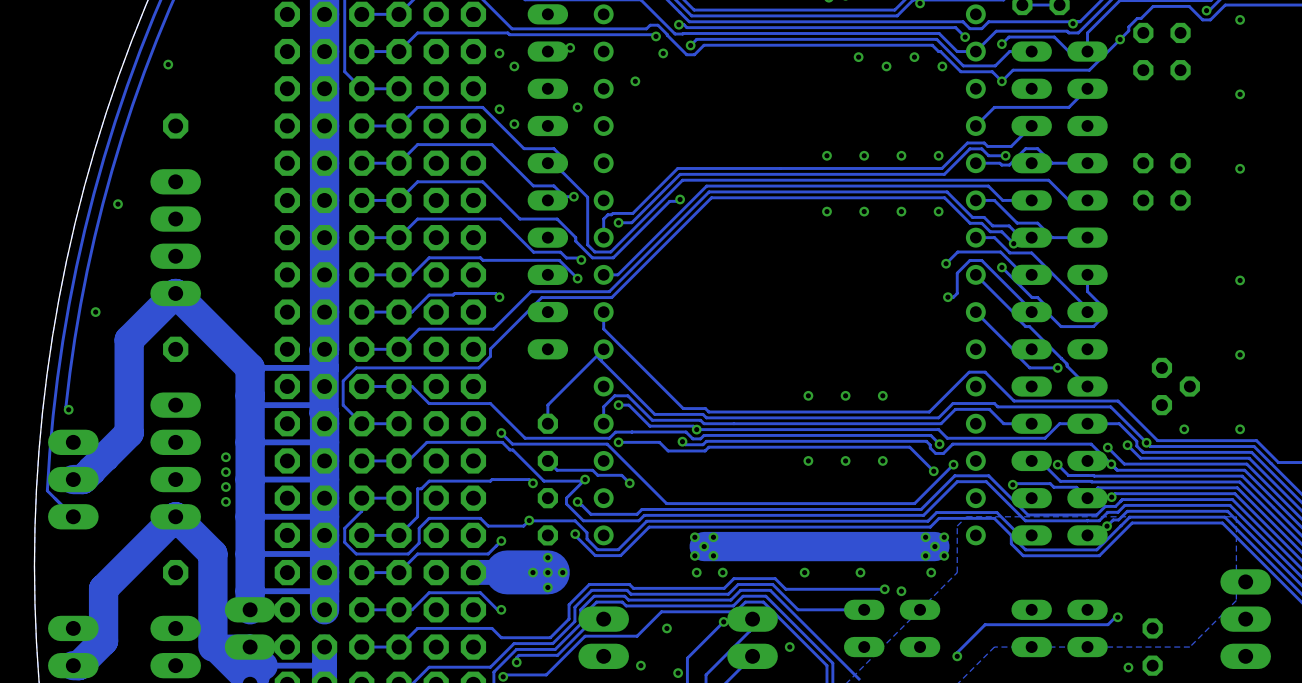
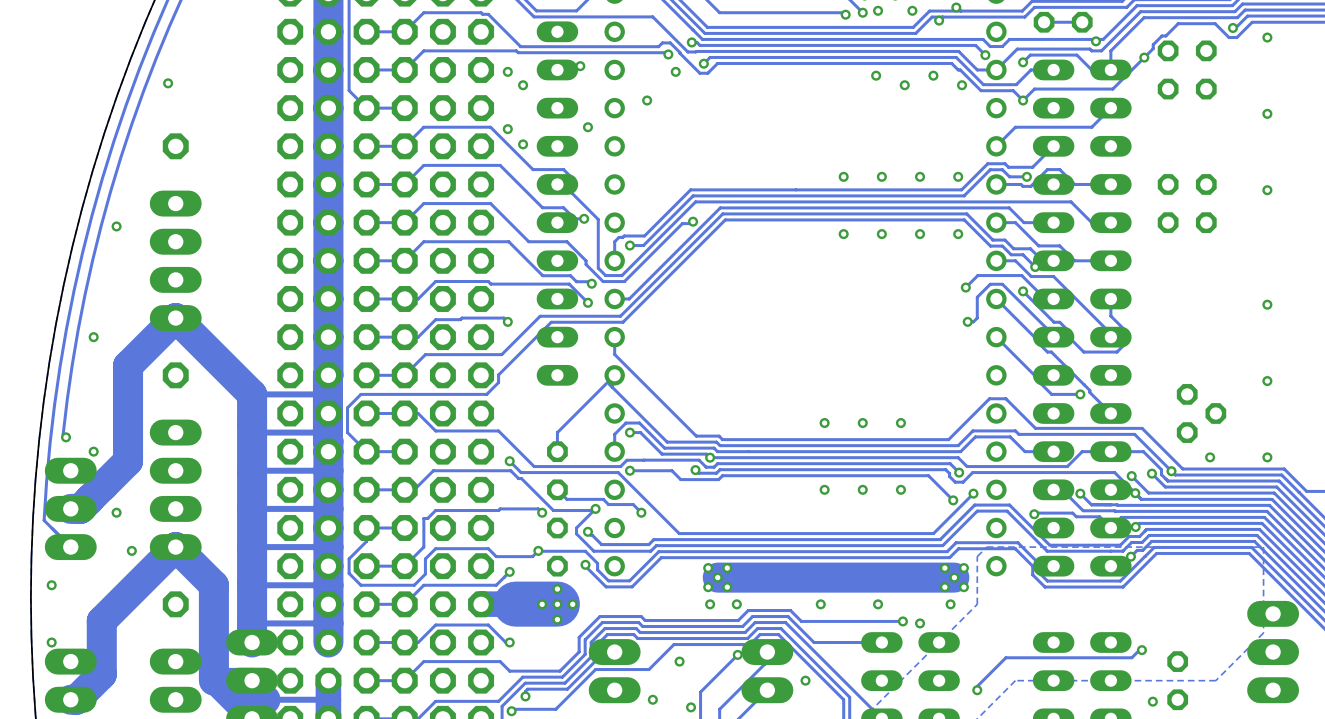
via: none -> (93, 451)
via: (225, 457) -> none
via: (225, 472) -> none
via: none -> (116, 512)
via: (225, 487) -> none
via: (225, 501) -> none
via: none -> (131, 550)
via: none -> (51, 585)
via: none -> (51, 642)

